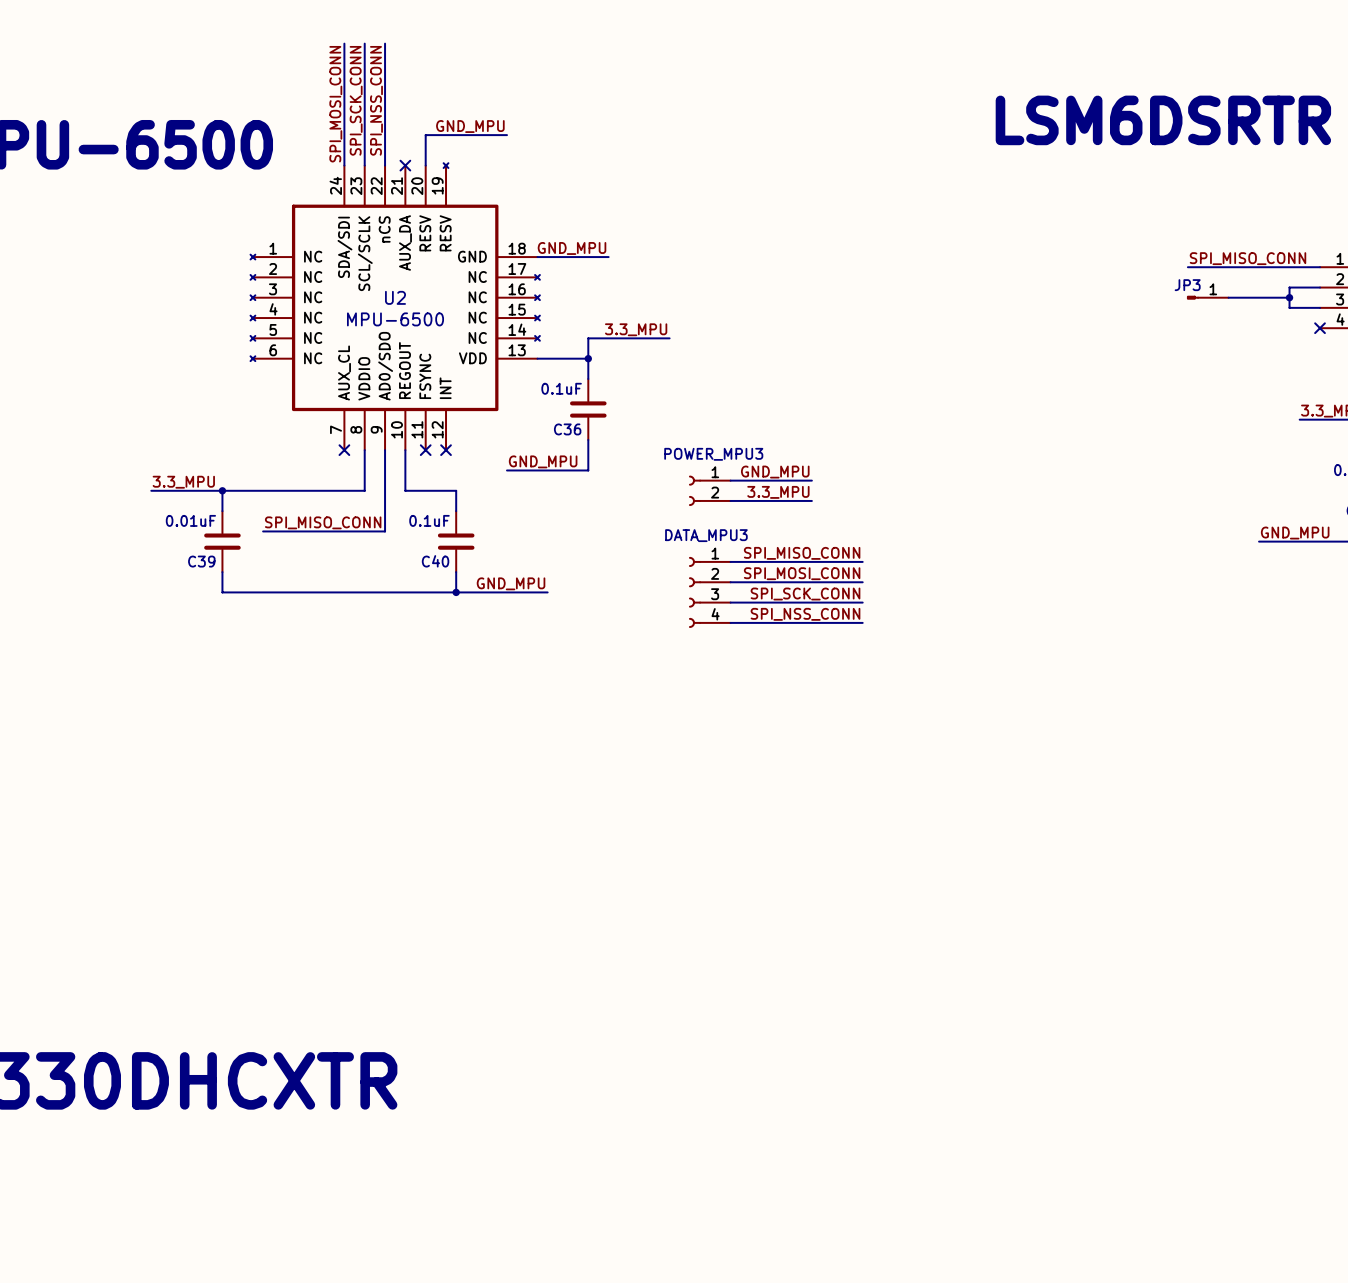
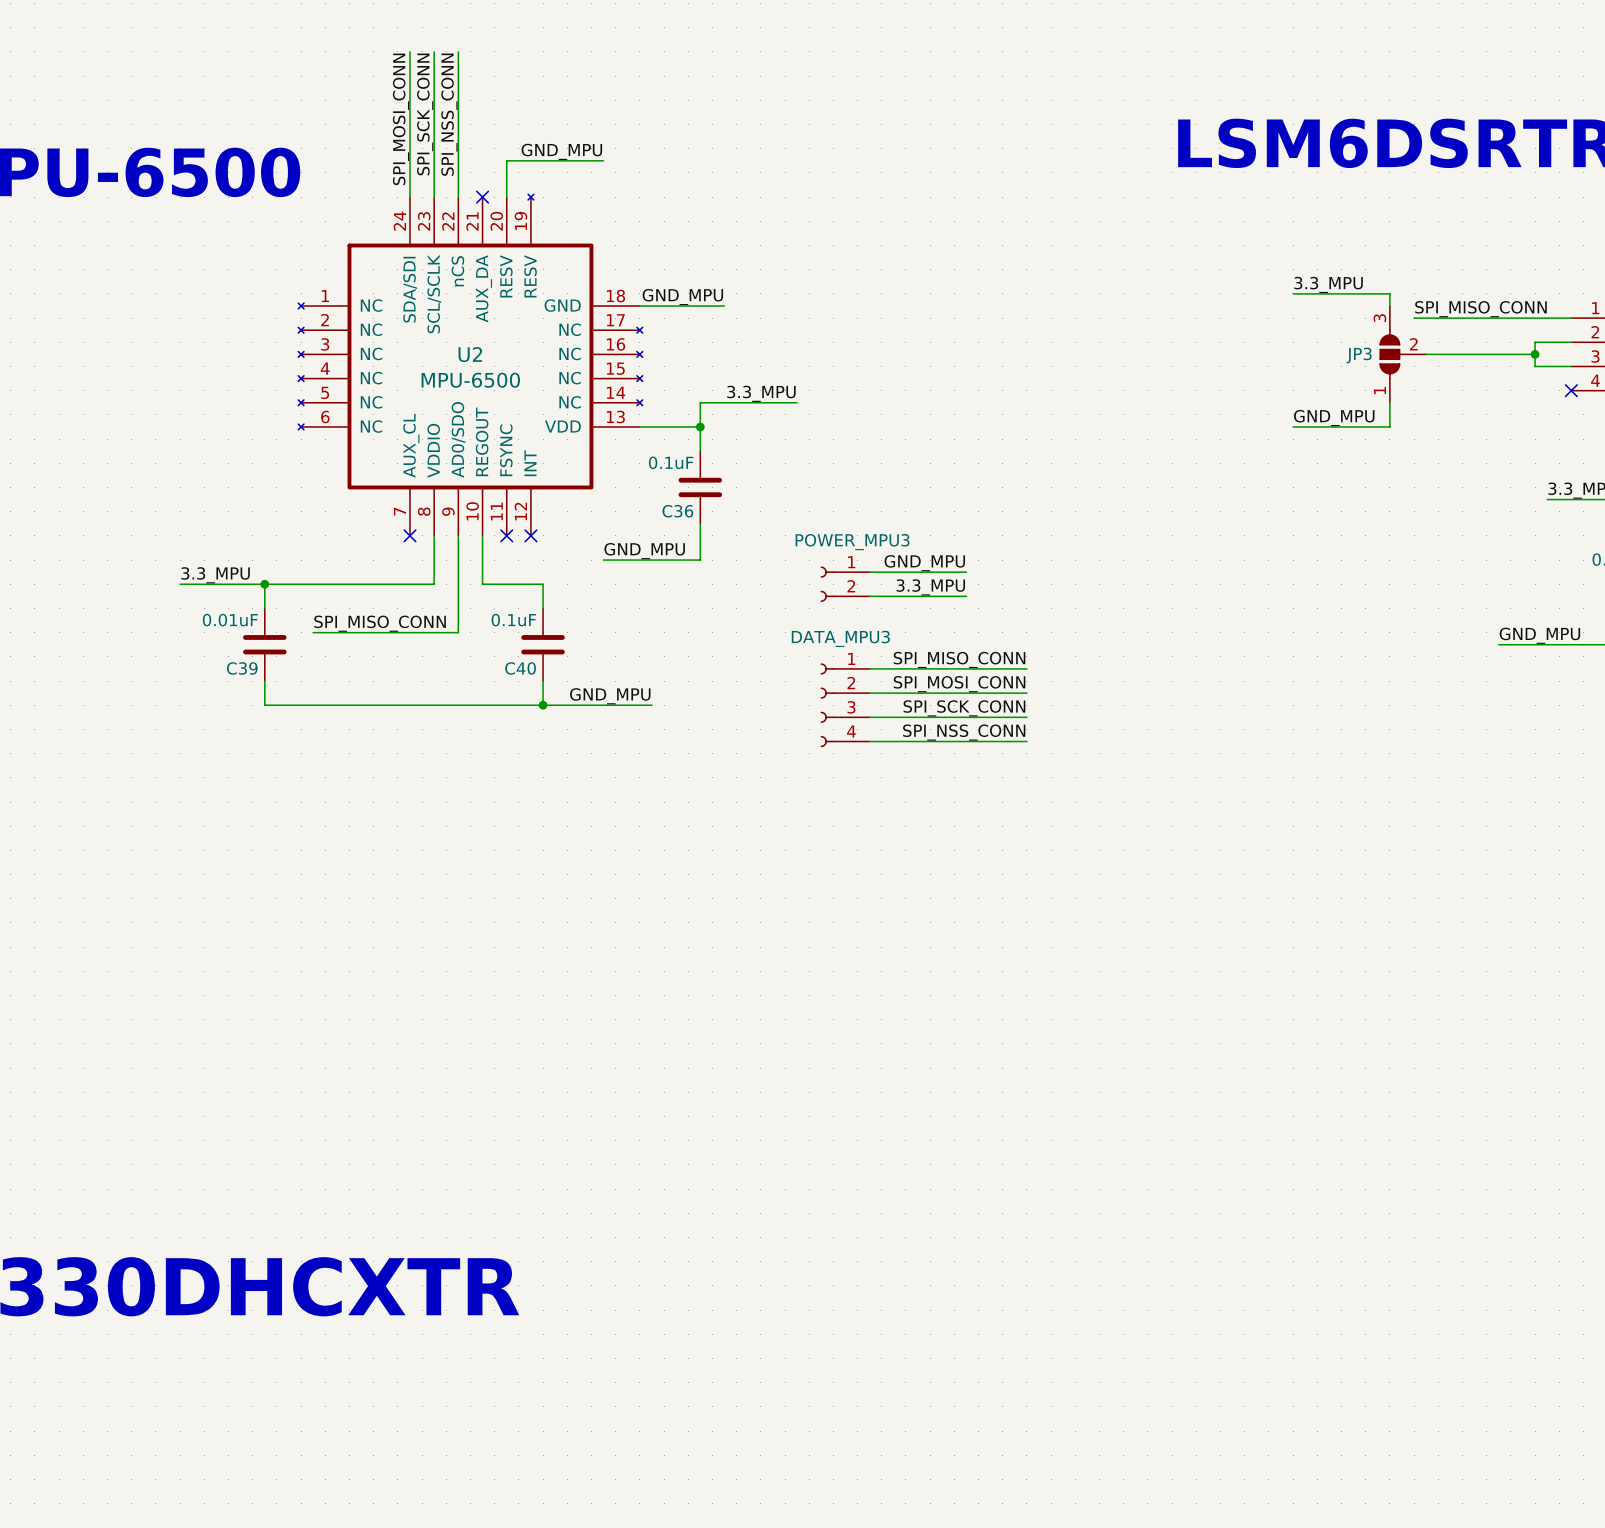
label: none -> 3.3_MPU (1328, 284)
wire: none -> (1293, 293) (1389, 293) (1389, 306)
JP3 name position: JP3 (1187, 285) -> JP3 (1359, 355)
JP3 symbol: [1187, 296, 1229, 300] -> [1380, 306, 1427, 403]
wire: none -> (1389, 402) (1389, 426) (1293, 426)
label: none -> GND_MPU (1334, 418)

